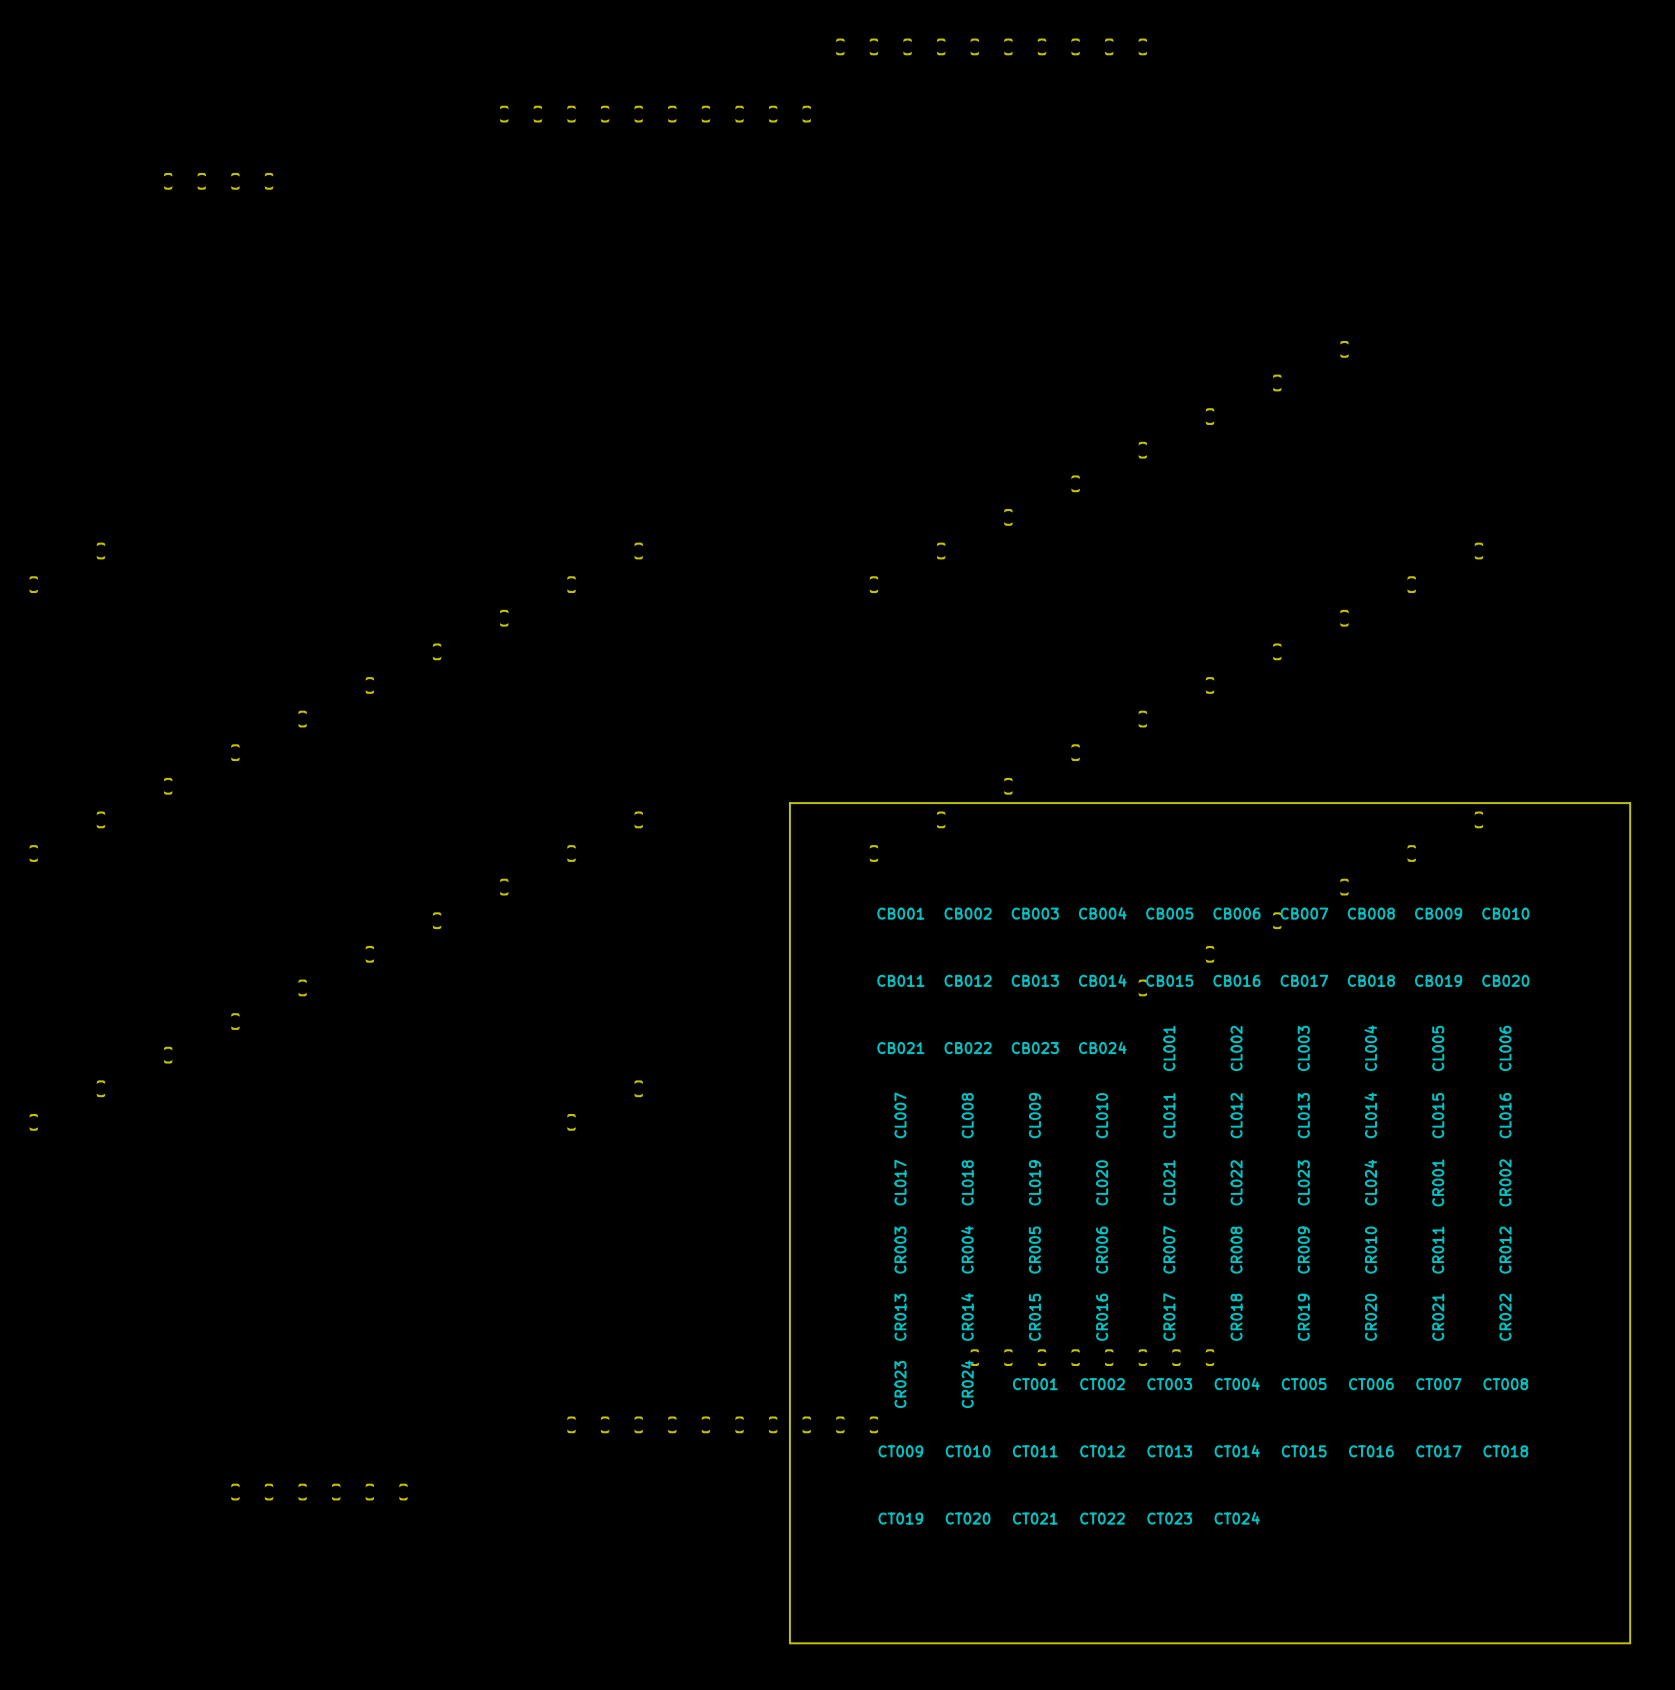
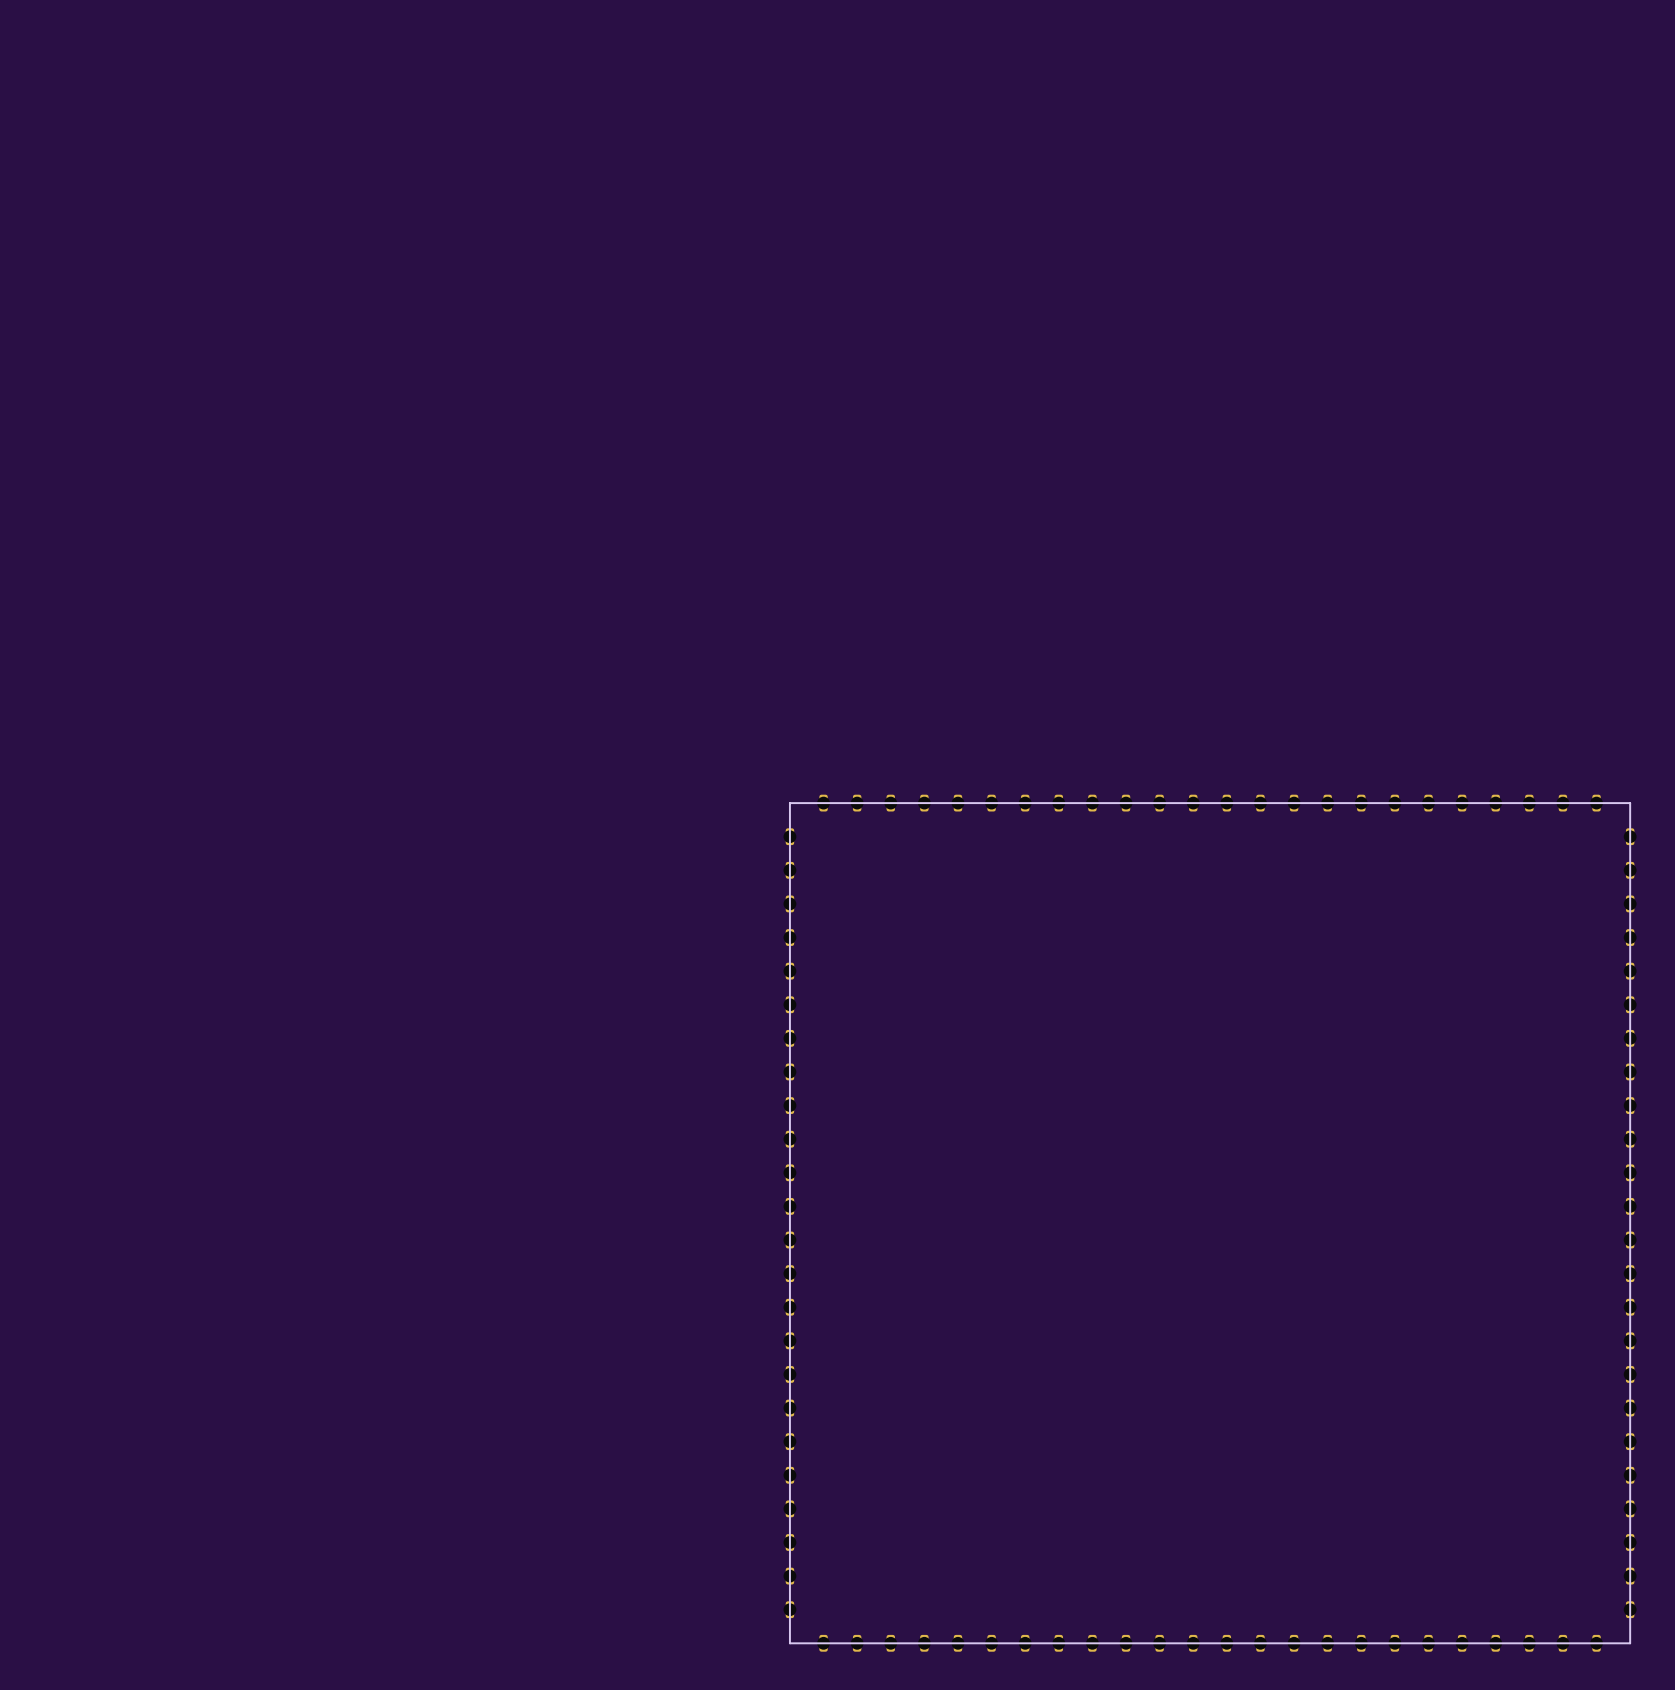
CB001: (840, 46) -> none
CB002: (873, 46) -> none
CB003: (907, 46) -> none
CB004: (941, 46) -> none
CB005: (974, 46) -> none
CB006: (1008, 46) -> none
CB007: (1042, 46) -> none
CB008: (1075, 46) -> none
CB009: (1109, 46) -> none
CB010: (1142, 46) -> none
CB011: (504, 114) -> none
CB012: (537, 114) -> none
CB013: (571, 114) -> none
CB014: (605, 114) -> none
CB015: (638, 114) -> none
CB016: (672, 114) -> none
CB017: (705, 114) -> none
CB018: (739, 114) -> none
CB019: (773, 114) -> none
CB020: (806, 114) -> none
CB021: (168, 181) -> none
CB022: (201, 181) -> none
CB023: (235, 181) -> none
CB024: (269, 181) -> none
CL024: (1344, 349) -> none
CL023: (1277, 382) -> none
CL022: (1210, 416) -> none
CL021: (1142, 450) -> none
CL020: (1075, 483) -> none
CL019: (1008, 517) -> none
CR024: (100, 551) -> none
CR022: (638, 551) -> none
CL018: (941, 551) -> none
CL016: (1478, 551) -> none
CR023: (33, 584) -> none
CR021: (571, 584) -> none
CL017: (873, 584) -> none
CL015: (1411, 584) -> none
CR020: (504, 618) -> none
CL014: (1344, 618) -> none
CR019: (437, 651) -> none
CL013: (1277, 651) -> none
CR018: (369, 685) -> none
CL012: (1210, 685) -> none
CR017: (302, 719) -> none
CL011: (1142, 719) -> none
CR016: (235, 752) -> none
CL010: (1075, 752) -> none
CR015: (168, 786) -> none
CL009: (1008, 786) -> none
part: none -> (823, 803)
part: none -> (857, 803)
part: none -> (890, 803)
part: none -> (924, 803)
part: none -> (957, 803)
part: none -> (991, 803)
part: none -> (1025, 803)
part: none -> (1058, 803)
part: none -> (1092, 803)
part: none -> (1126, 803)
part: none -> (1159, 803)
part: none -> (1193, 803)
part: none -> (1226, 803)
part: none -> (1260, 803)
part: none -> (1294, 803)
part: none -> (1327, 803)
part: none -> (1361, 803)
part: none -> (1394, 803)
part: none -> (1428, 803)
part: none -> (1462, 803)
part: none -> (1495, 803)
part: none -> (1529, 803)
part: none -> (1562, 803)
part: none -> (1596, 803)
CR014: (100, 819) -> none
CR012: (638, 819) -> none
CL008: (941, 819) -> none
CL006: (1478, 819) -> none
part: none -> (789, 836)
part: none -> (1630, 836)
CR013: (33, 853) -> none
CR011: (571, 853) -> none
CL007: (873, 853) -> none
CL005: (1411, 853) -> none
part: none -> (789, 870)
part: none -> (1630, 870)
CR010: (504, 887) -> none
CL004: (1344, 887) -> none
part: none -> (789, 903)
part: none -> (1630, 903)
CR009: (437, 920) -> none
CL003: (1277, 920) -> none
part: none -> (789, 937)
part: none -> (1630, 937)
CR008: (369, 954) -> none
CL002: (1210, 954) -> none
part: none -> (789, 971)
part: none -> (1630, 971)
CR007: (302, 987) -> none
CL001: (1142, 987) -> none
part: none -> (789, 1004)
part: none -> (1630, 1004)
CR006: (235, 1021) -> none
part: none -> (789, 1038)
part: none -> (1630, 1038)
CR005: (168, 1055) -> none
part: none -> (789, 1071)
part: none -> (1630, 1071)
CR004: (100, 1088) -> none
CR002: (638, 1088) -> none
part: none -> (789, 1105)
part: none -> (1630, 1105)
CR003: (33, 1122) -> none
CR001: (571, 1122) -> none
part: none -> (789, 1139)
part: none -> (1630, 1139)
part: none -> (789, 1172)
part: none -> (1630, 1172)
part: none -> (789, 1206)
part: none -> (1630, 1206)
part: none -> (789, 1240)
part: none -> (1630, 1240)
part: none -> (789, 1273)
part: none -> (1630, 1273)
part: none -> (789, 1307)
part: none -> (1630, 1307)
part: none -> (789, 1340)
part: none -> (1630, 1340)
CT001: (974, 1357) -> none
CT002: (1008, 1357) -> none
CT003: (1042, 1357) -> none
CT004: (1075, 1357) -> none
CT005: (1109, 1357) -> none
CT006: (1142, 1357) -> none
CT007: (1176, 1357) -> none
CT008: (1210, 1357) -> none
part: none -> (789, 1374)
part: none -> (1630, 1374)
part: none -> (789, 1408)
part: none -> (1630, 1408)
CT009: (571, 1424) -> none
CT010: (605, 1424) -> none
CT011: (638, 1424) -> none
CT012: (672, 1424) -> none
CT013: (705, 1424) -> none
CT014: (739, 1424) -> none
CT015: (773, 1424) -> none
CT016: (806, 1424) -> none
CT017: (840, 1424) -> none
CT018: (873, 1424) -> none
part: none -> (789, 1441)
part: none -> (1630, 1441)
part: none -> (789, 1475)
part: none -> (1630, 1475)
CT019: (235, 1492) -> none
CT020: (269, 1492) -> none
CT021: (302, 1492) -> none
CT022: (336, 1492) -> none
CT023: (369, 1492) -> none
CT024: (403, 1492) -> none
part: none -> (789, 1508)
part: none -> (1630, 1508)
part: none -> (789, 1542)
part: none -> (1630, 1542)
part: none -> (789, 1576)
part: none -> (1630, 1576)
part: none -> (789, 1609)
part: none -> (1630, 1609)
part: none -> (823, 1643)
part: none -> (857, 1643)
part: none -> (890, 1643)
part: none -> (924, 1643)
part: none -> (957, 1643)
part: none -> (991, 1643)
part: none -> (1025, 1643)
part: none -> (1058, 1643)
part: none -> (1092, 1643)
part: none -> (1126, 1643)
part: none -> (1159, 1643)
part: none -> (1193, 1643)
part: none -> (1226, 1643)
part: none -> (1260, 1643)
part: none -> (1294, 1643)
part: none -> (1327, 1643)
part: none -> (1361, 1643)
part: none -> (1394, 1643)
part: none -> (1428, 1643)
part: none -> (1462, 1643)
part: none -> (1495, 1643)
part: none -> (1529, 1643)
part: none -> (1562, 1643)
part: none -> (1596, 1643)

